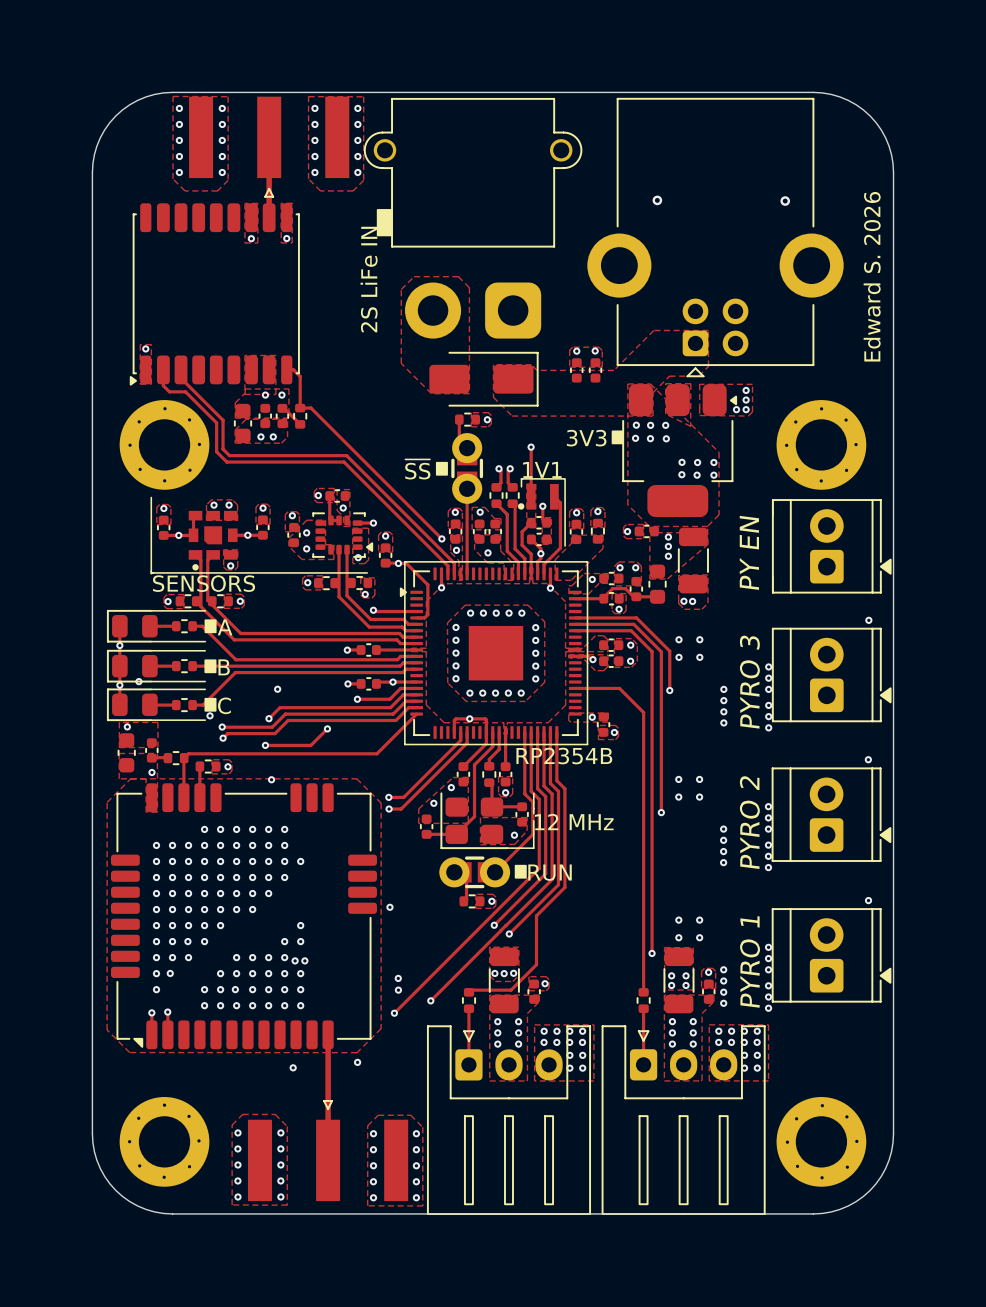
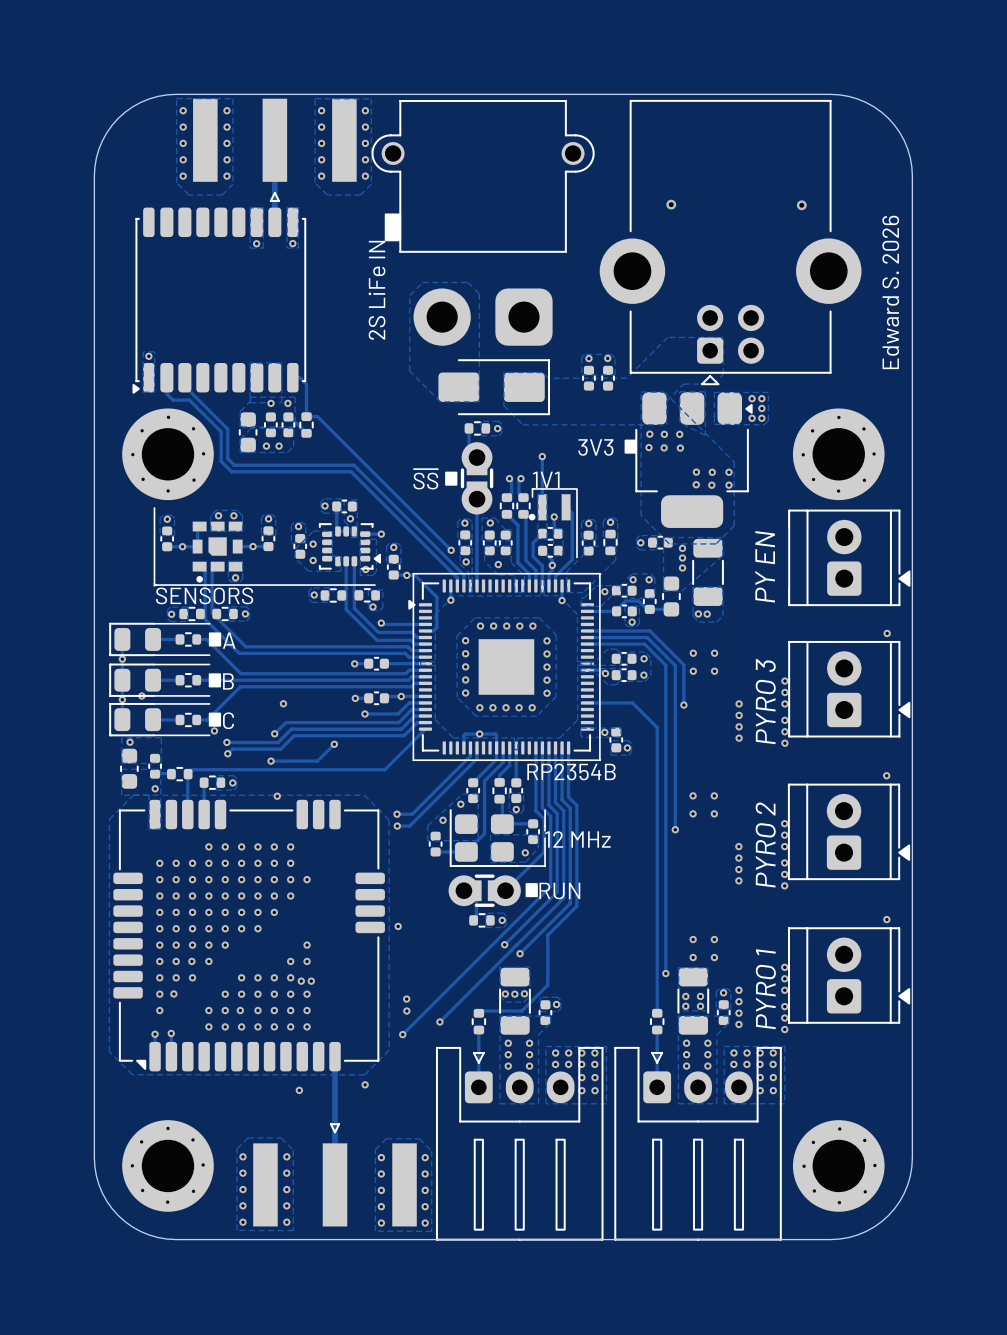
via: none -> (752, 398)

